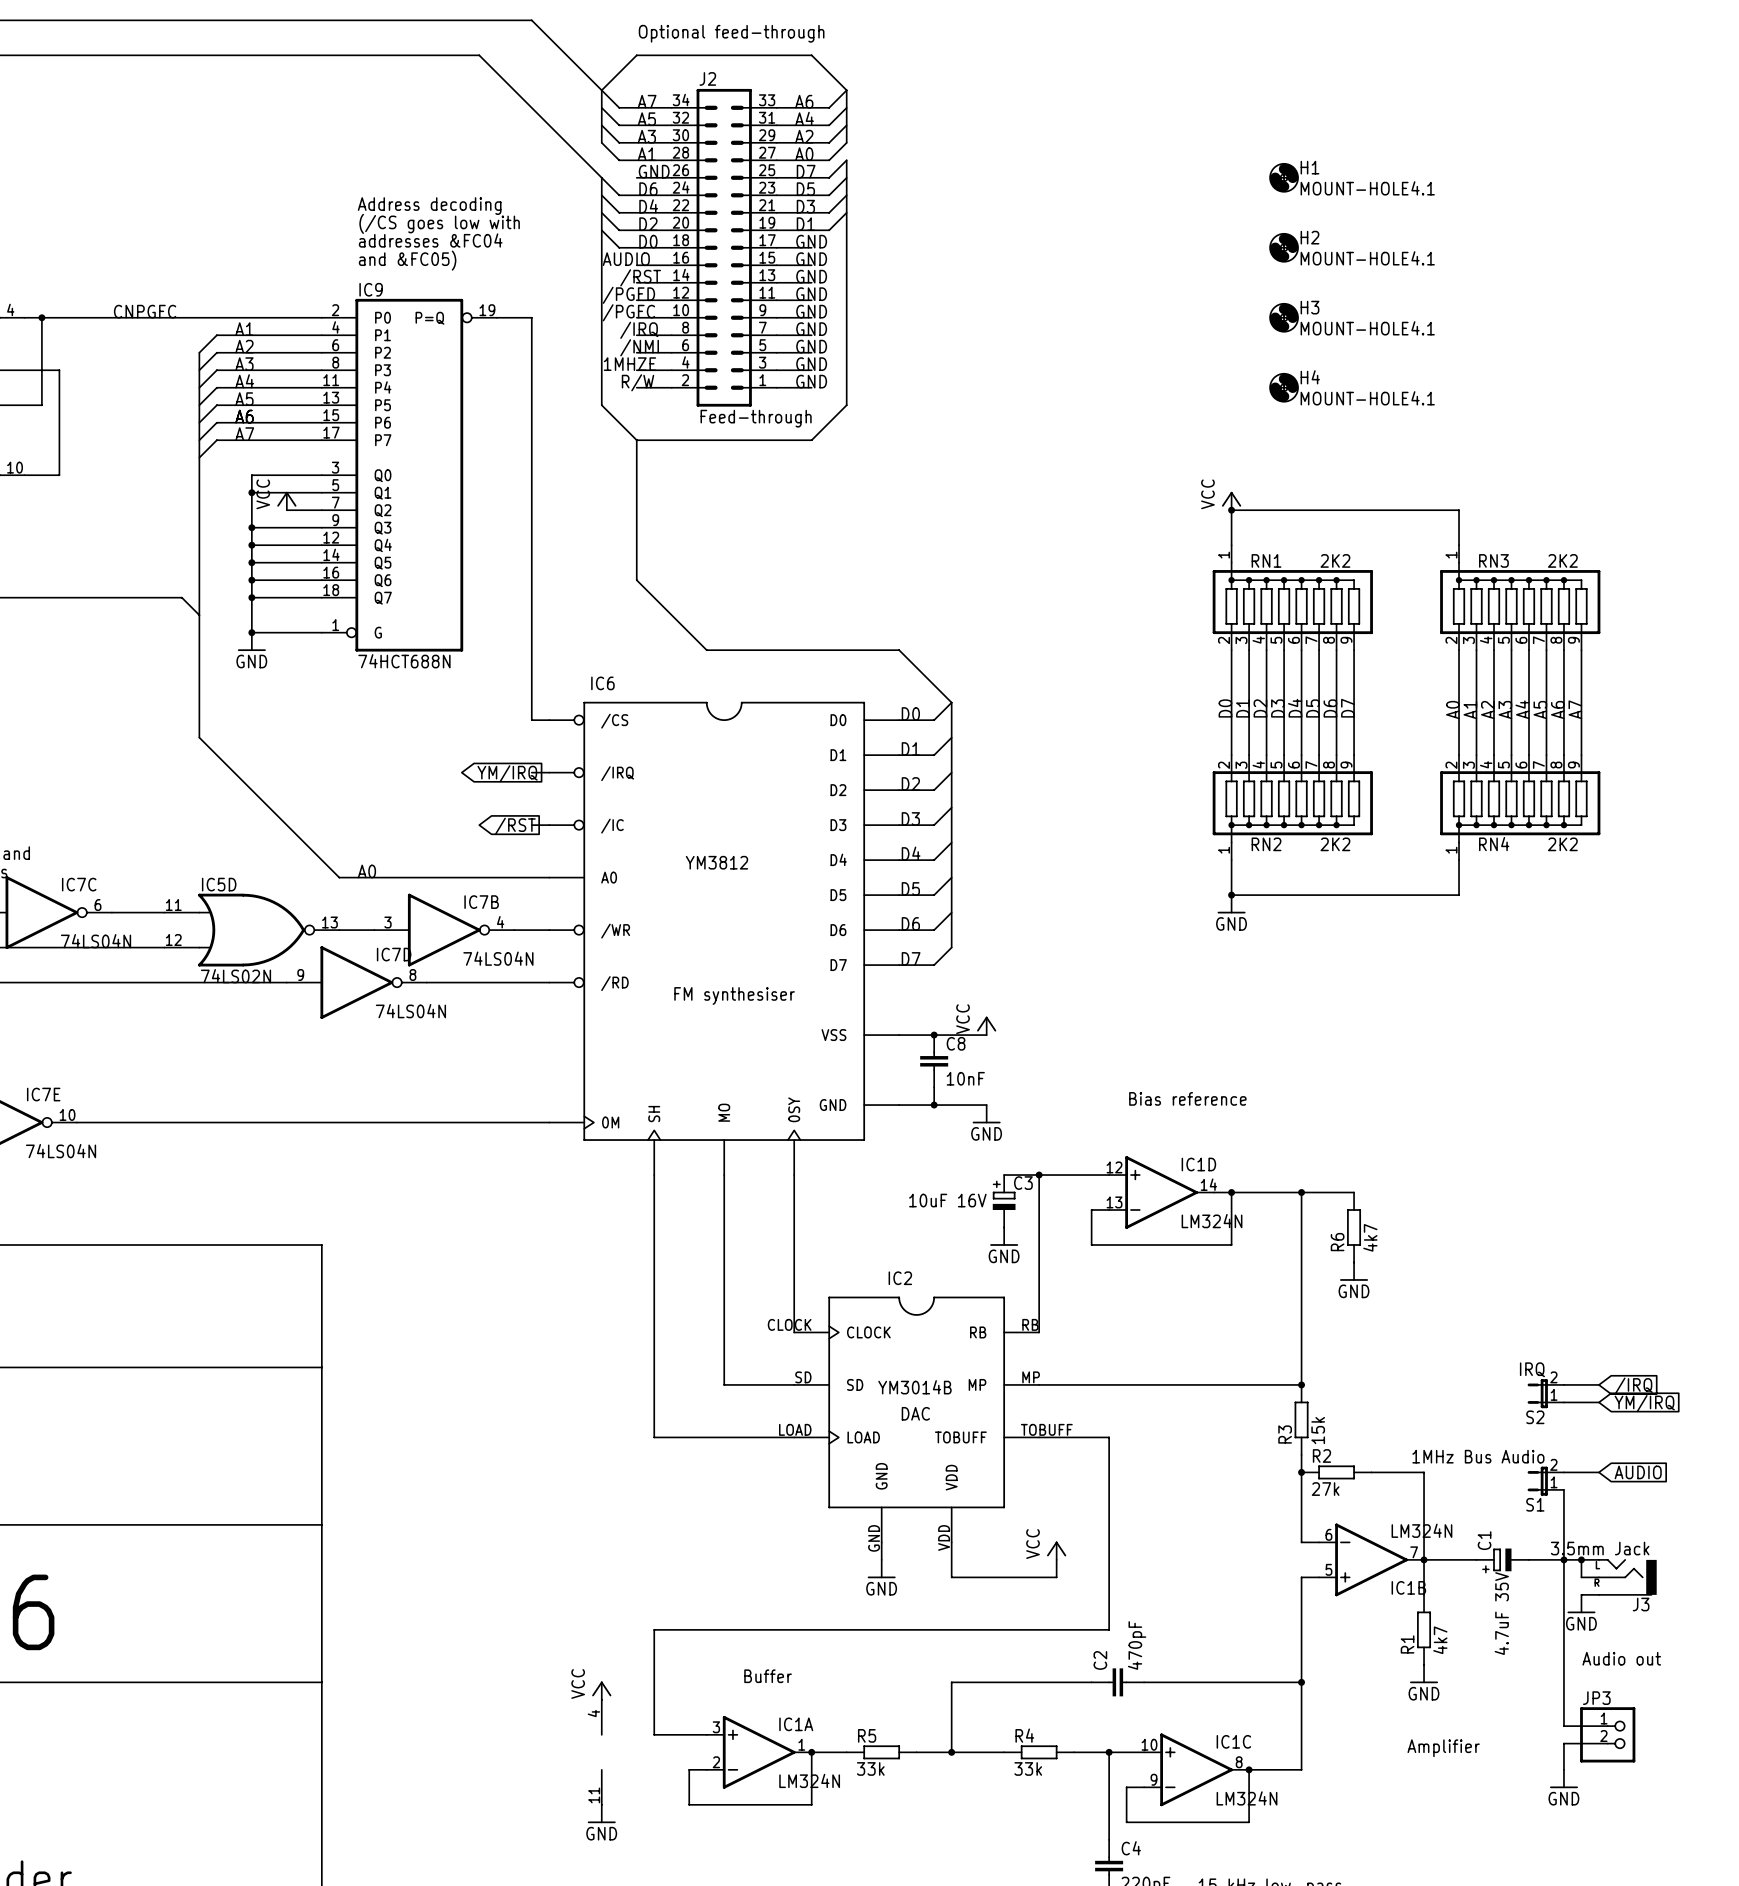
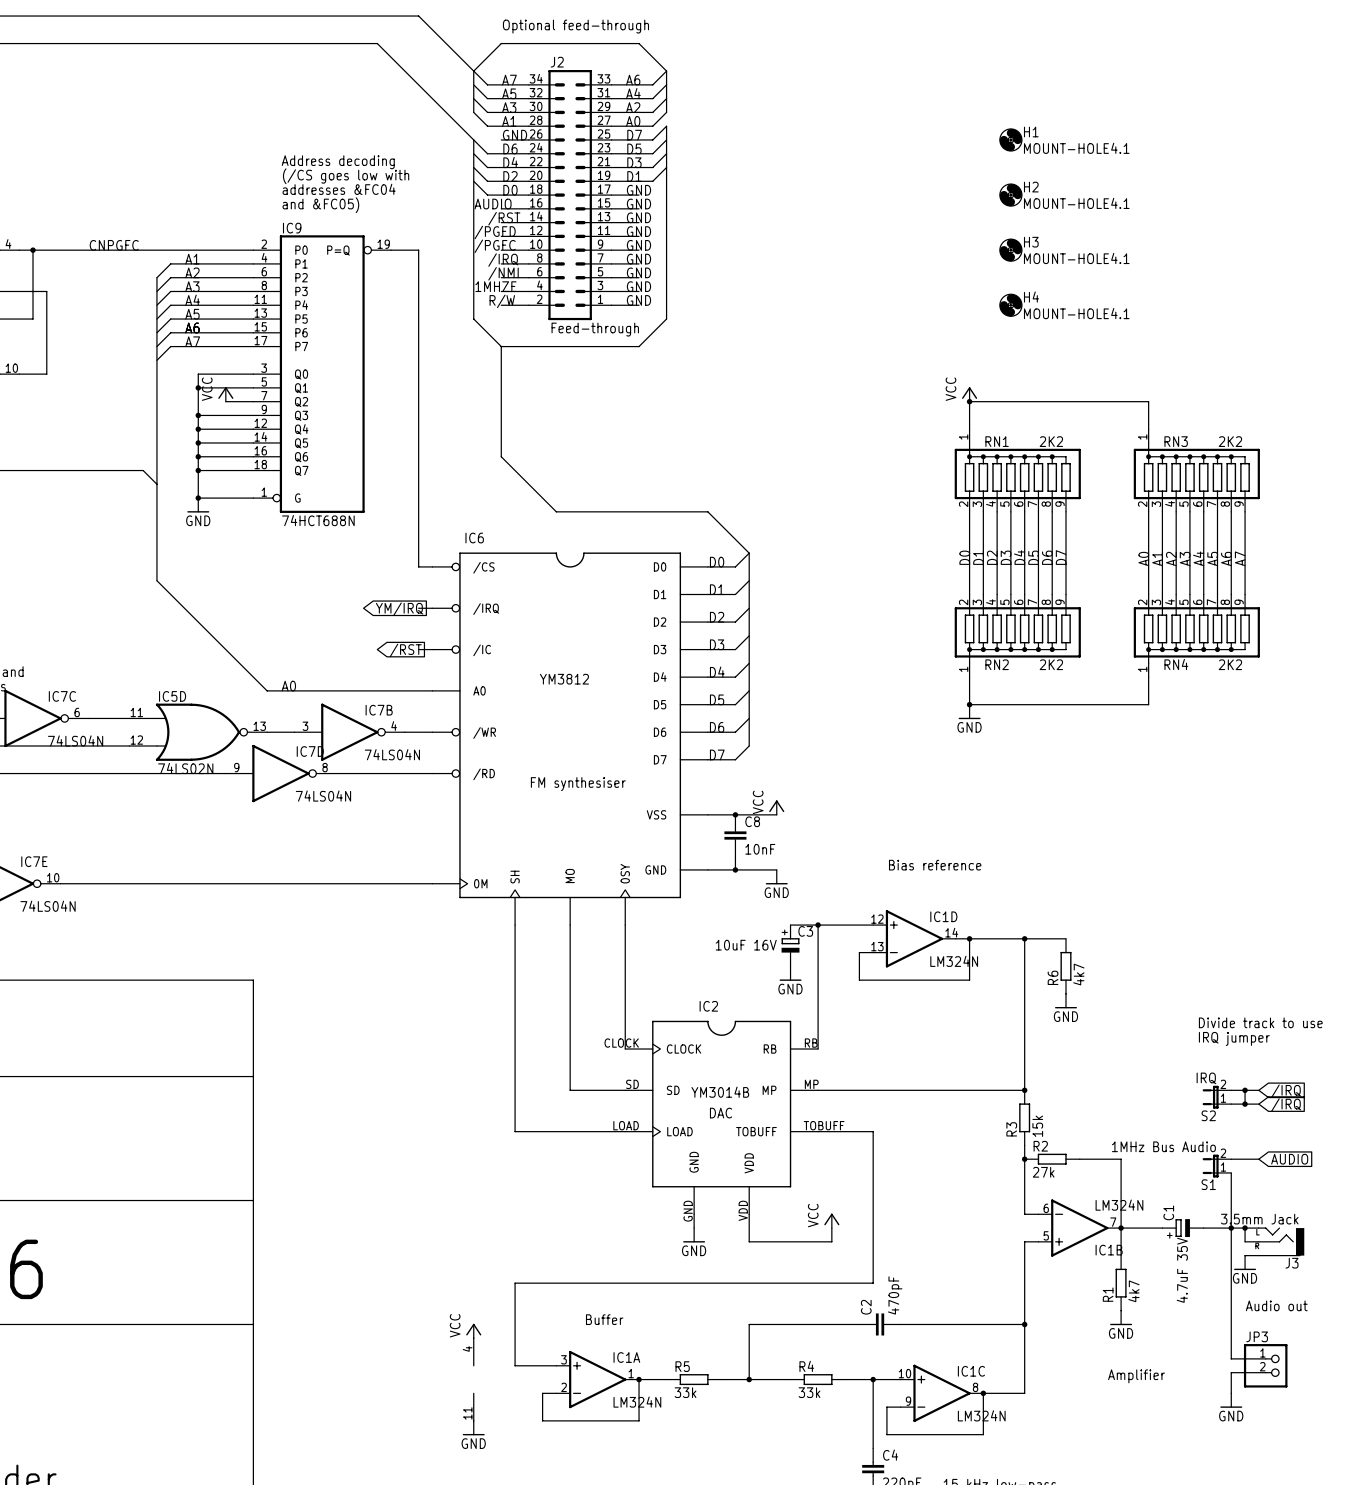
text: none -> Divide track to use (1260, 1022)
text: none -> IRQ jumper (1234, 1038)
wire: none -> (1245, 1090) (1245, 1104)
junction: none -> (1245, 1090)
junction: none -> (1245, 1104)
global label: YM/IRQ (1644, 1403) -> /IRQ (1286, 1105)

